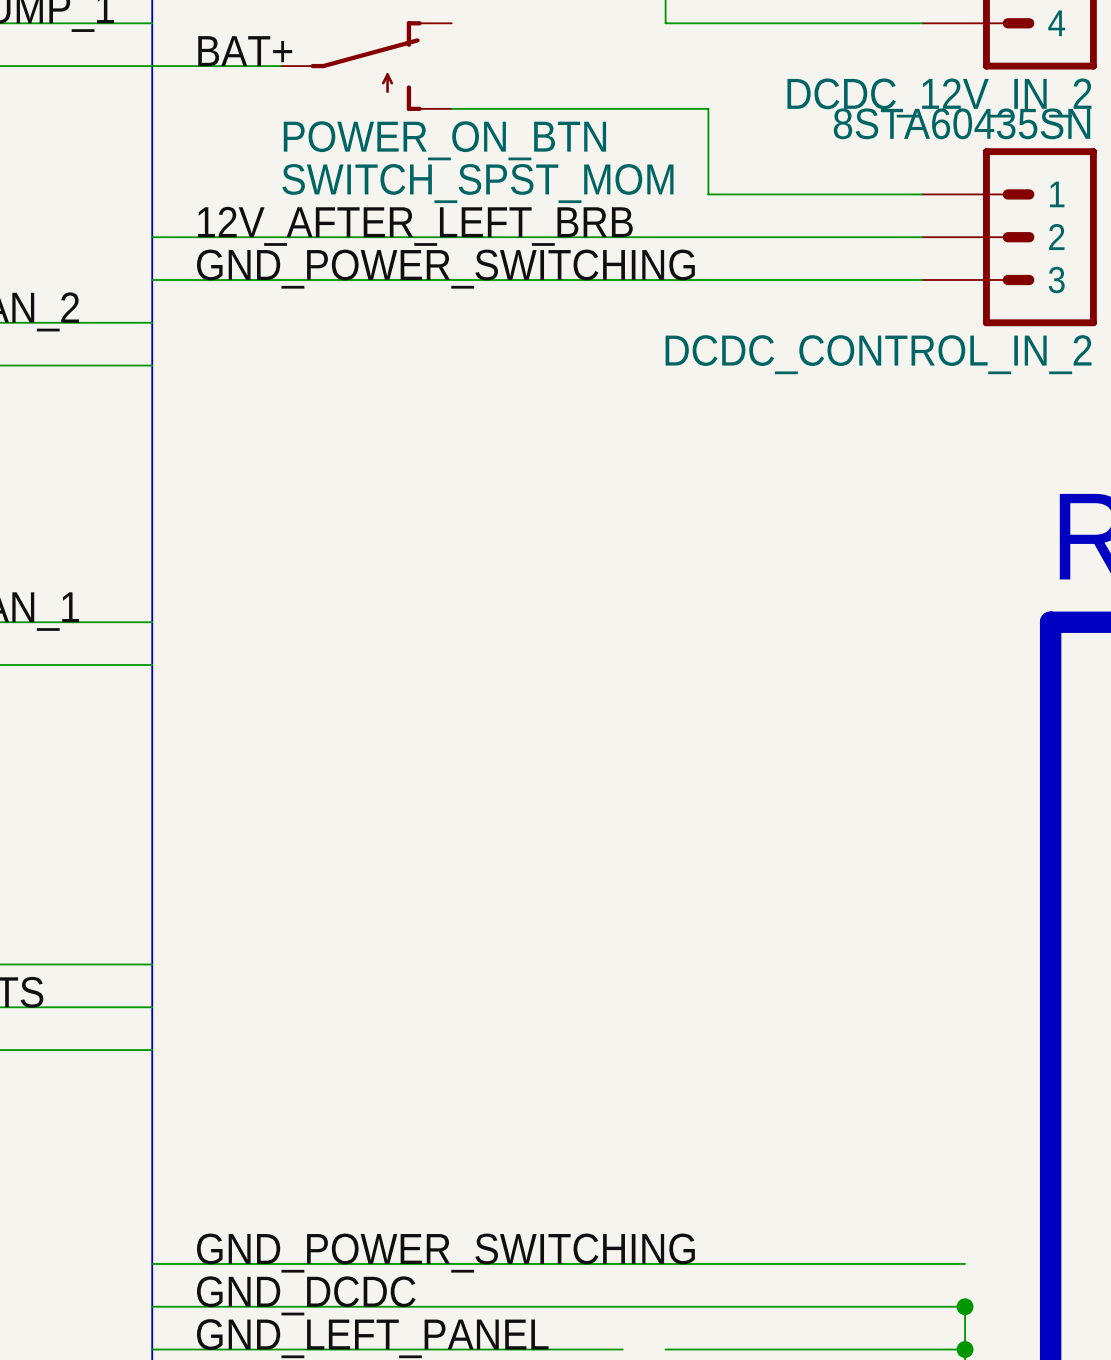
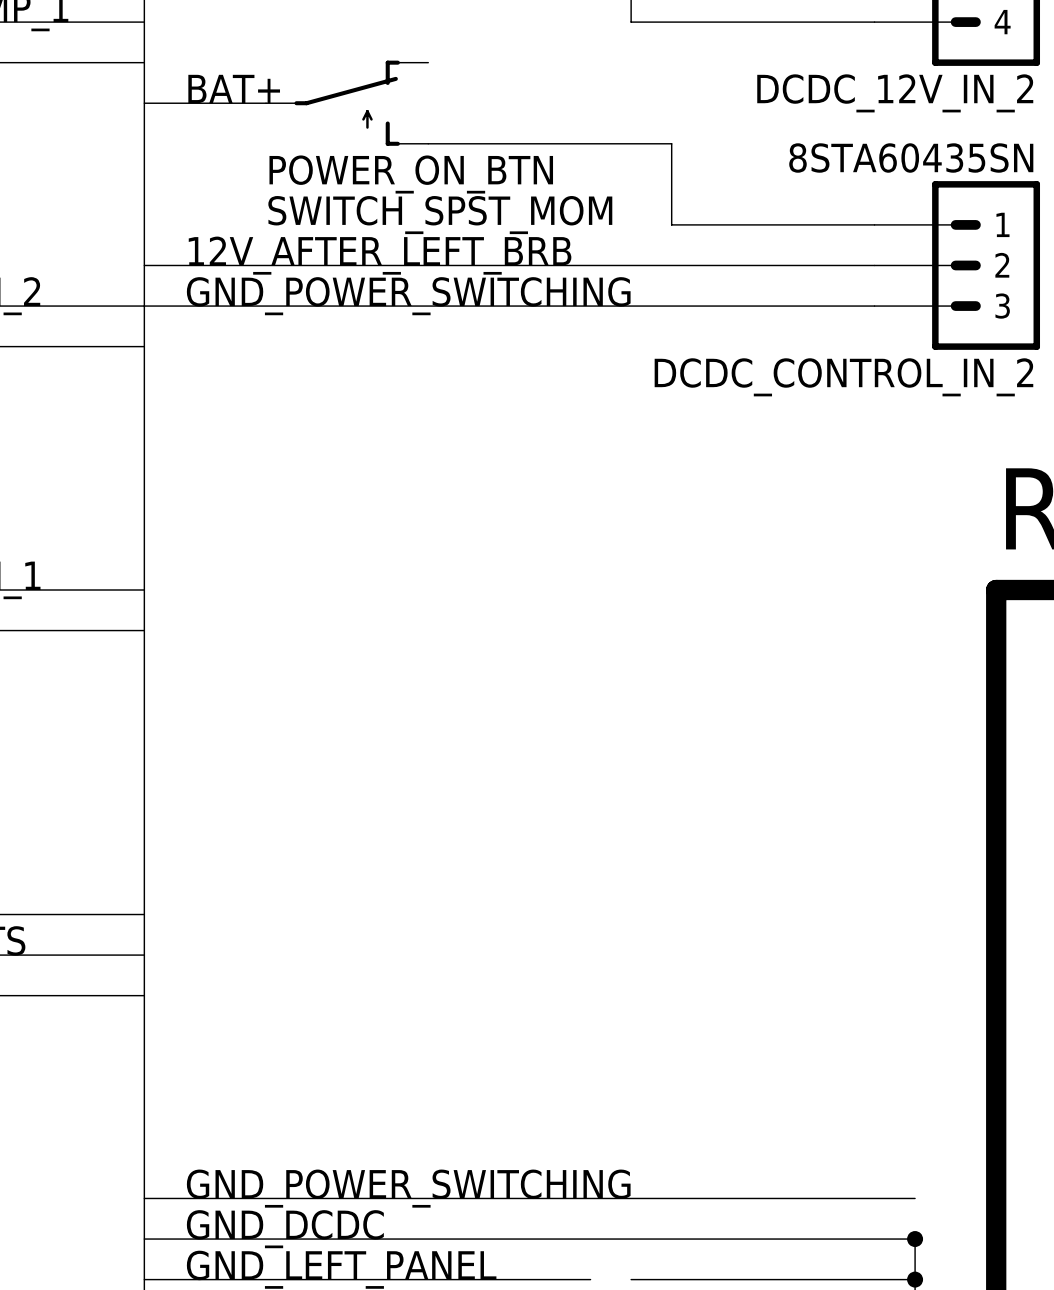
label position: BAT+ (245, 51) -> BAT+ (234, 89)
wire: (152, 66) (280, 66) -> (144, 103) (266, 103)
POWER_ON_BTN position: (366, 66) -> (347, 103)
wire: (451, 108) (708, 108) (708, 151) -> (428, 143) (671, 143)
wire: (708, 194) (922, 194) -> (671, 184) (671, 224)
label: 12V_AFTER_LEFT_BRB (415, 226) -> none
wire: (152, 237) (708, 237) -> none
DCDC_CONTROL_IN_2 position: (1009, 237) -> (957, 265)
label: GND_POWER_SWITCHING (445, 269) -> 12V_AFTER_LEFT_BRB (380, 255)
label: none -> GND_POWER_SWITCHING (408, 296)
wire: none -> (144, 306) (874, 306)

